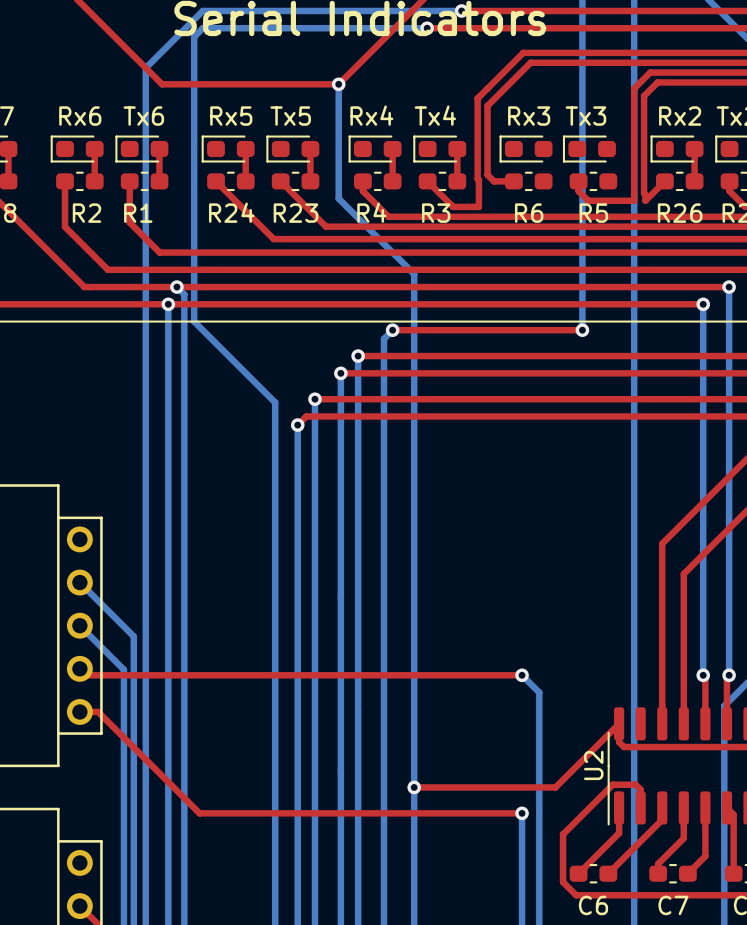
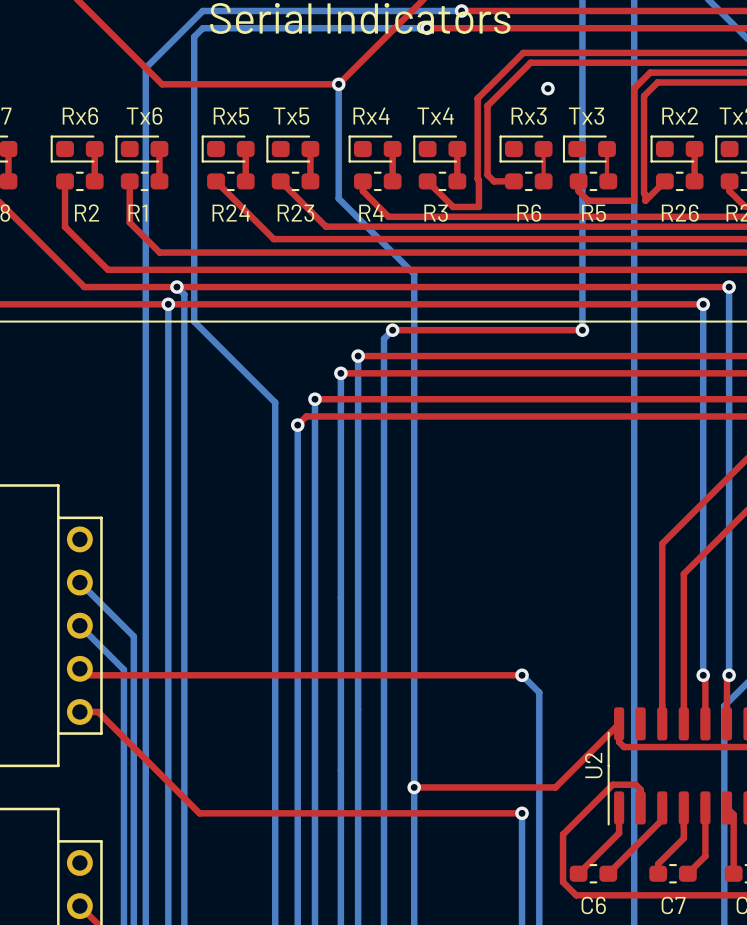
via: none -> (547, 88)
top track: none -> (543, 149) (543, 181)
top track: none -> (607, 149) (608, 181)

